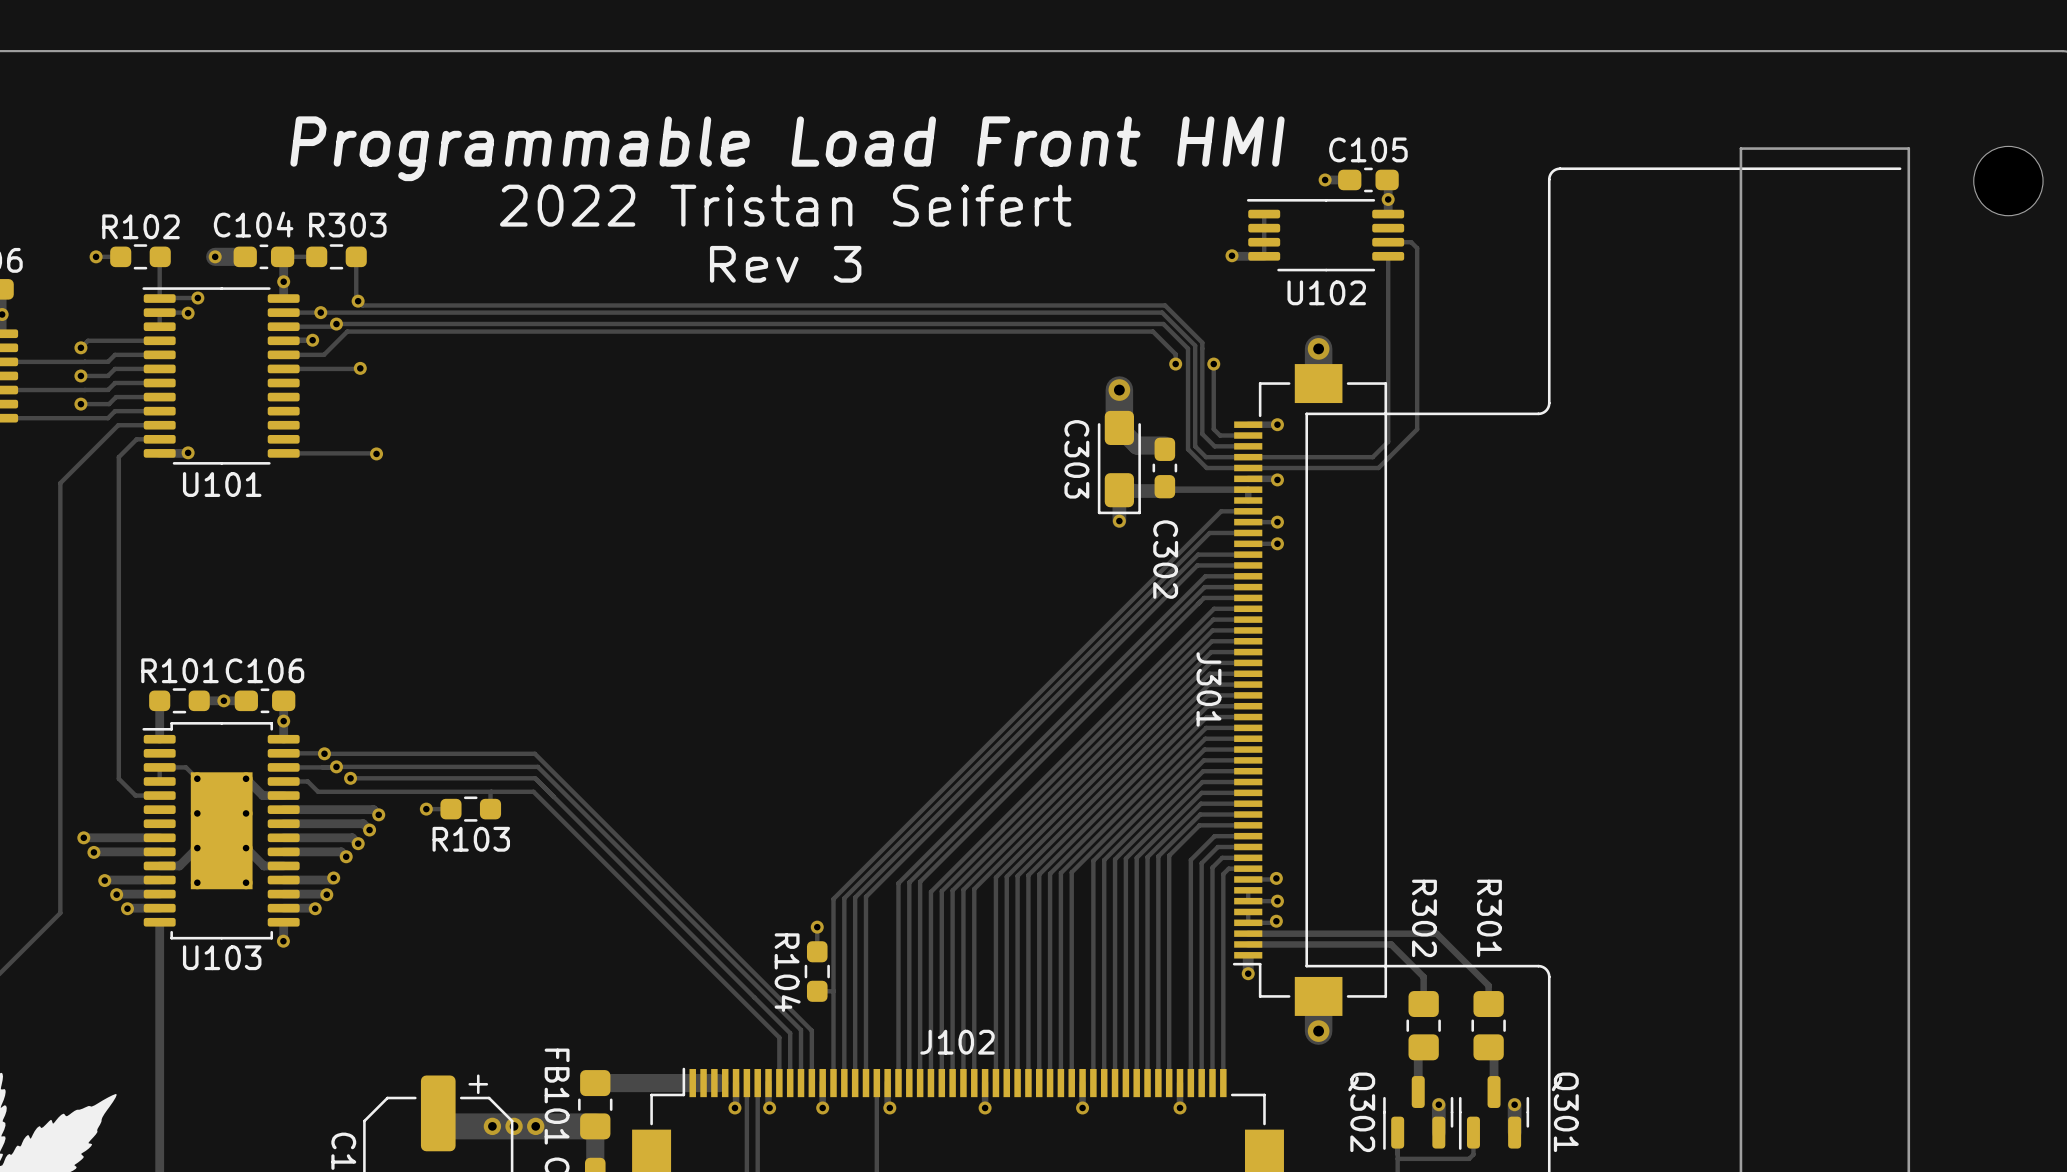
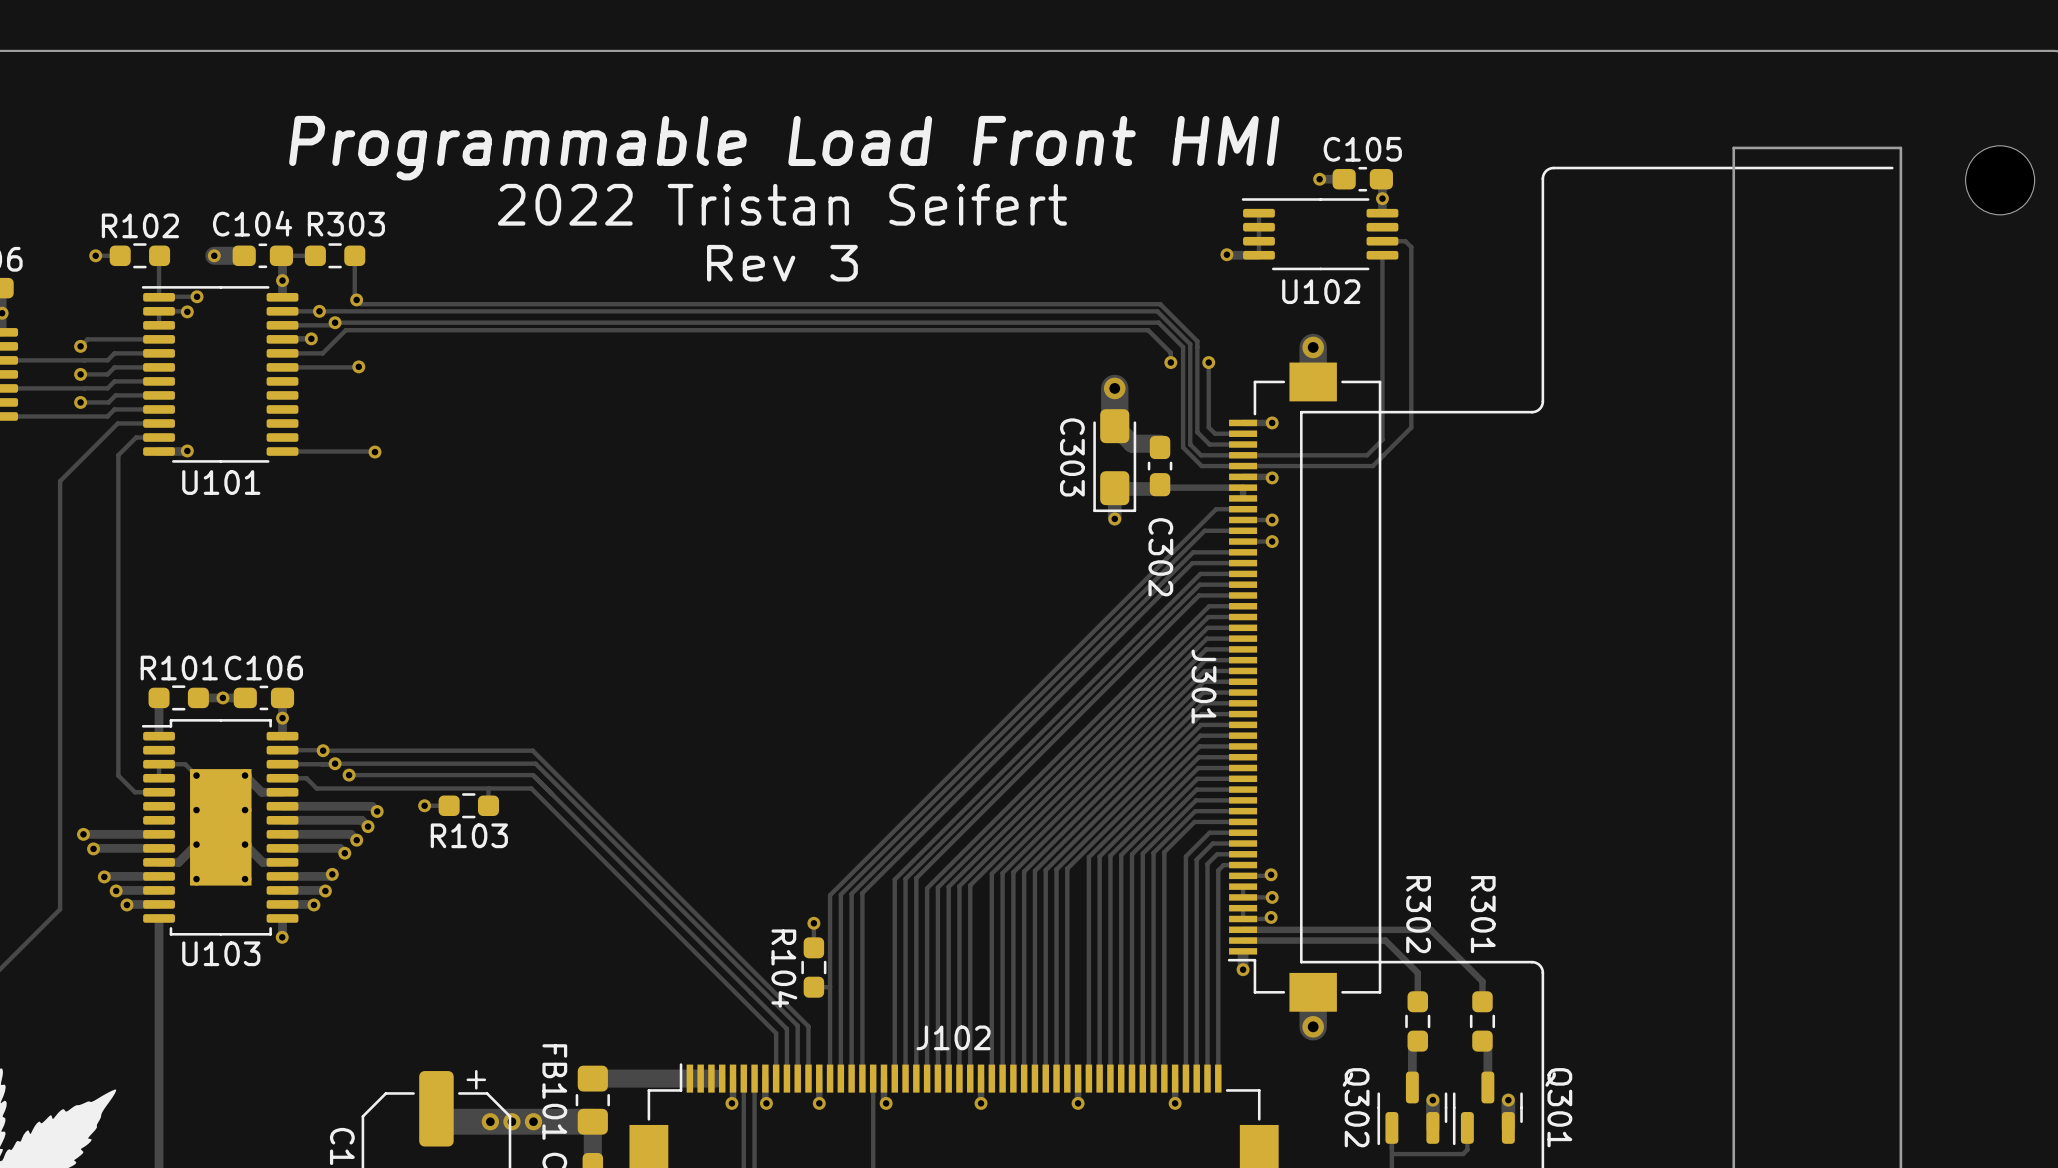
R302 footprint: [1406, 991, 1441, 1061] -> [1405, 991, 1431, 1052]
R301 footprint: [1471, 991, 1506, 1061] -> [1469, 991, 1496, 1052]

